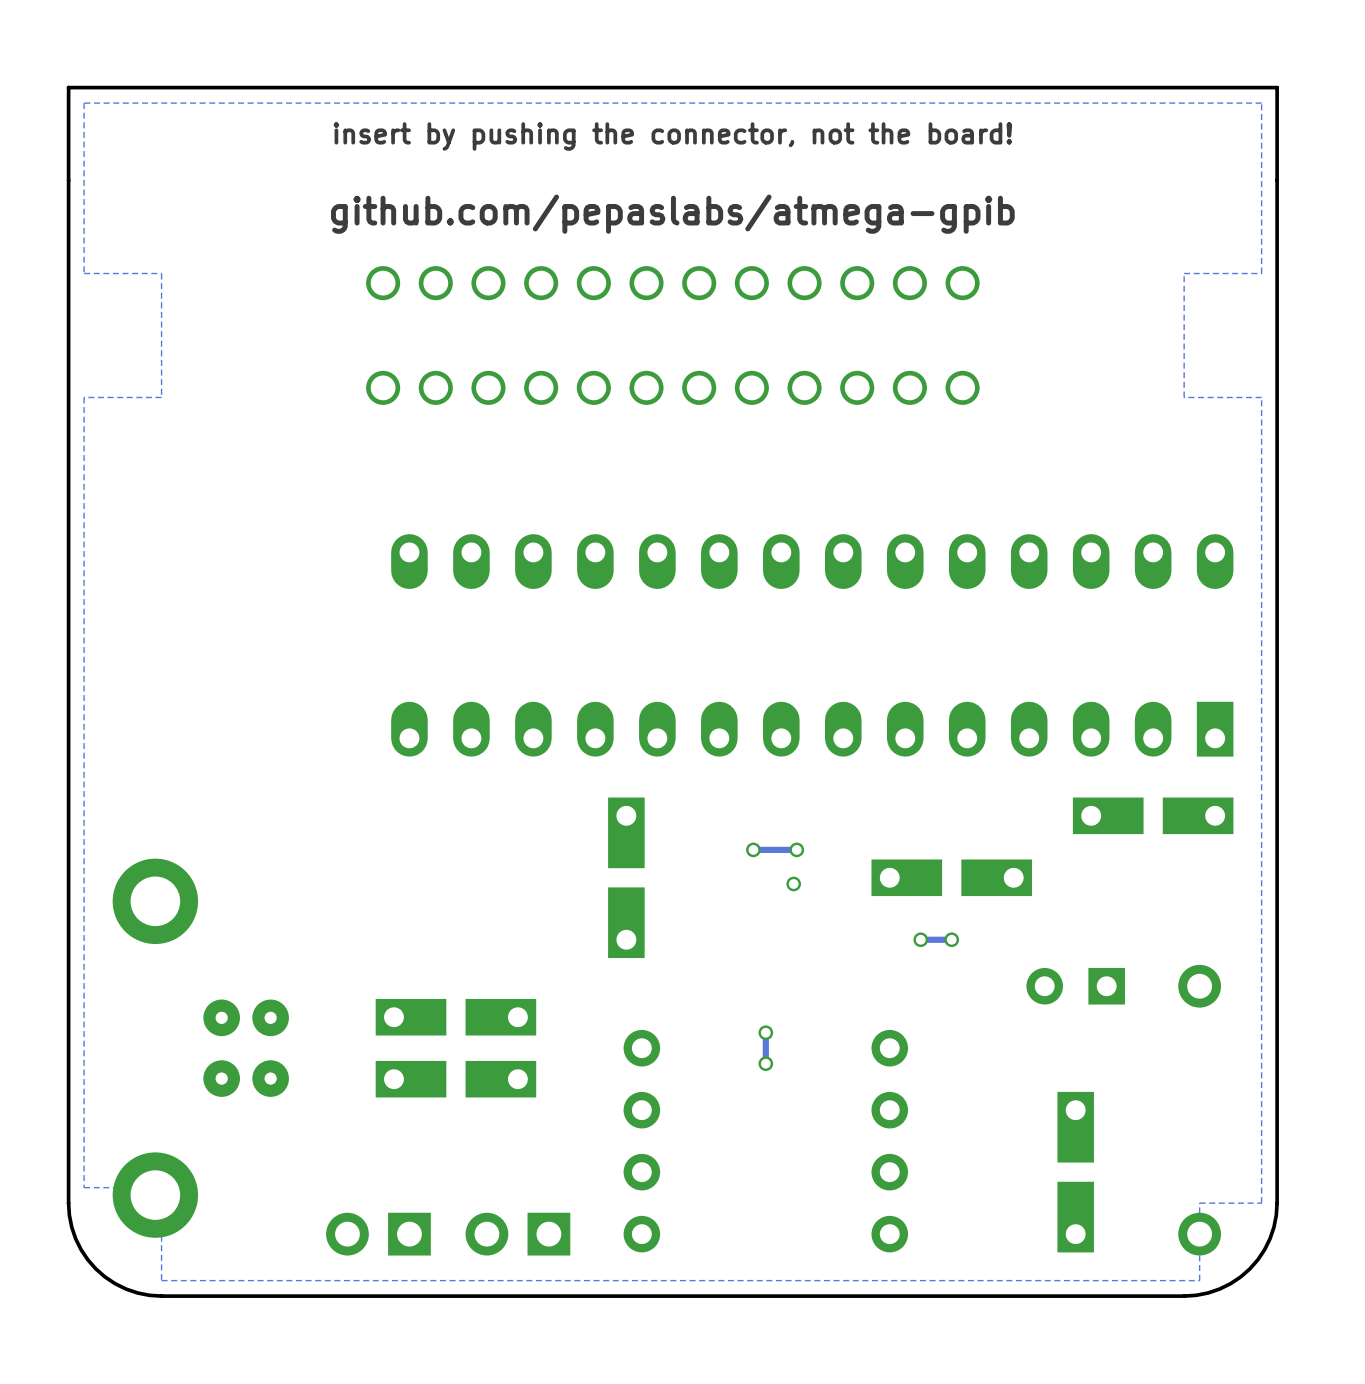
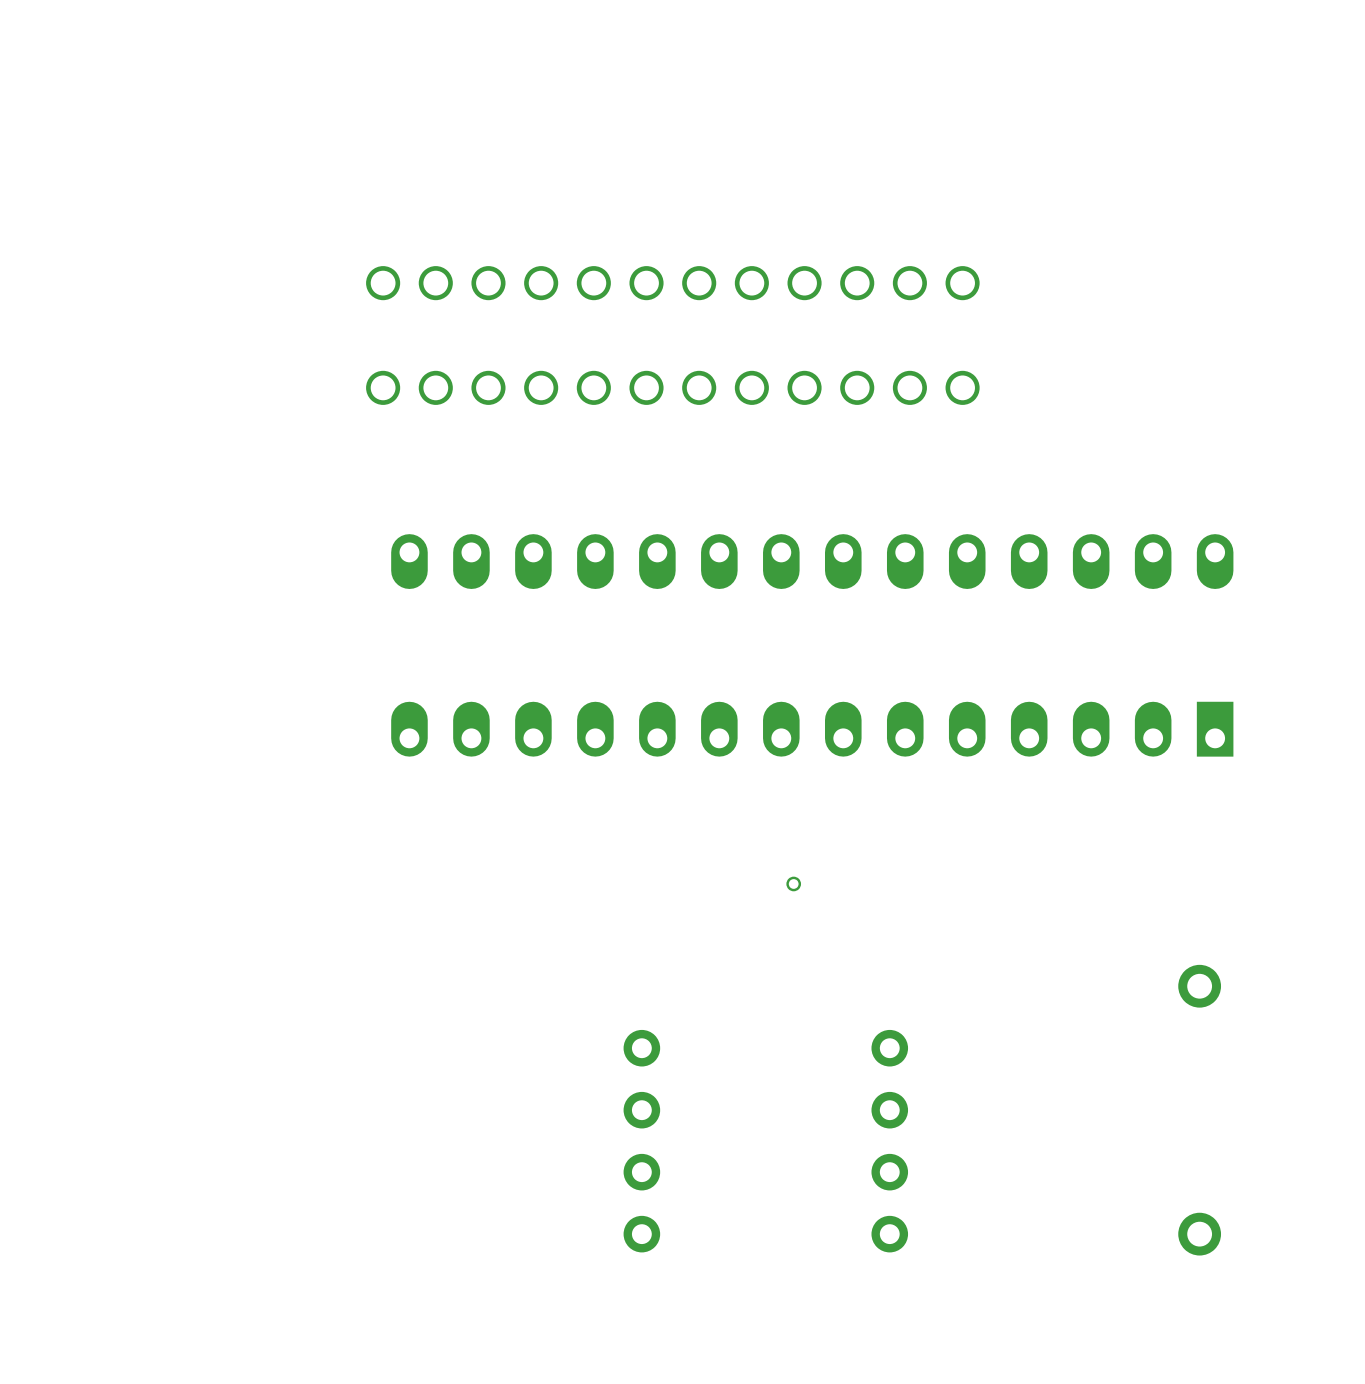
board edge: (1277, 87) (1277, 1203) (1276, 1215) (1270, 1238) (1264, 1249) (1249, 1268) (1230, 1283) (1219, 1289) (1196, 1295) (1184, 1296) (161, 1296) (149, 1295) (125, 1289) (115, 1283) (95, 1268) (81, 1249) (75, 1238) (69, 1215) (68, 1203) (68, 87) (1277, 87) -> none
zone outline: (1261, 103) (1261, 273) (1184, 273) (1184, 397) (1261, 397) (1261, 1203) (1199, 1203) (1199, 1280) (161, 1280) (161, 1187) (84, 1187) (84, 397) (161, 397) (161, 273) (84, 273) (84, 103) (1261, 103) -> none
text: insert by pushing the connector, not the board! (672, 136) -> none
text: github.com/pepaslabs/atmega-gpib (672, 214) -> none
part: (1153, 815) -> none
via: (753, 849) -> none
track: (796, 849) (753, 849) -> none
via: (796, 849) -> none
part: (626, 877) -> none
part: (951, 877) -> none
via: (920, 939) -> none
track: (951, 939) (920, 939) -> none
via: (951, 939) -> none
part: (1075, 986) -> none
part: (455, 1017) -> none
track: (765, 1032) (765, 1063) -> none
via: (765, 1032) -> none
part: (200, 1048) -> none
via: (765, 1063) -> none
part: (455, 1079) -> none
part: (1075, 1172) -> none
part: (378, 1234) -> none
part: (517, 1234) -> none

